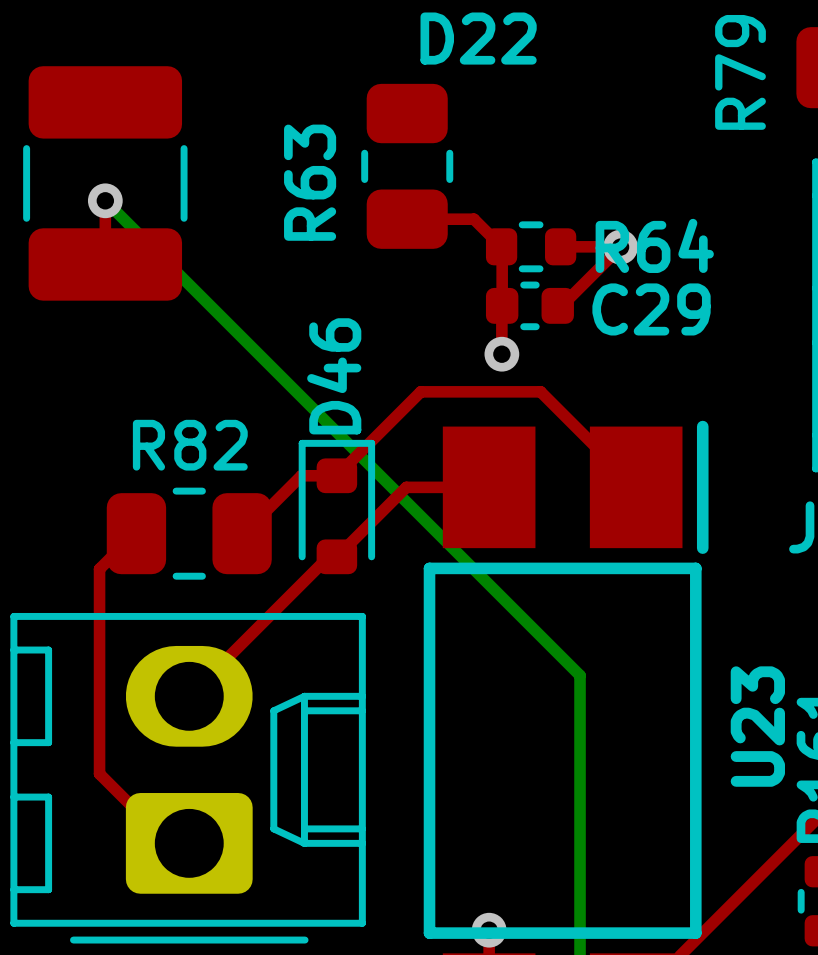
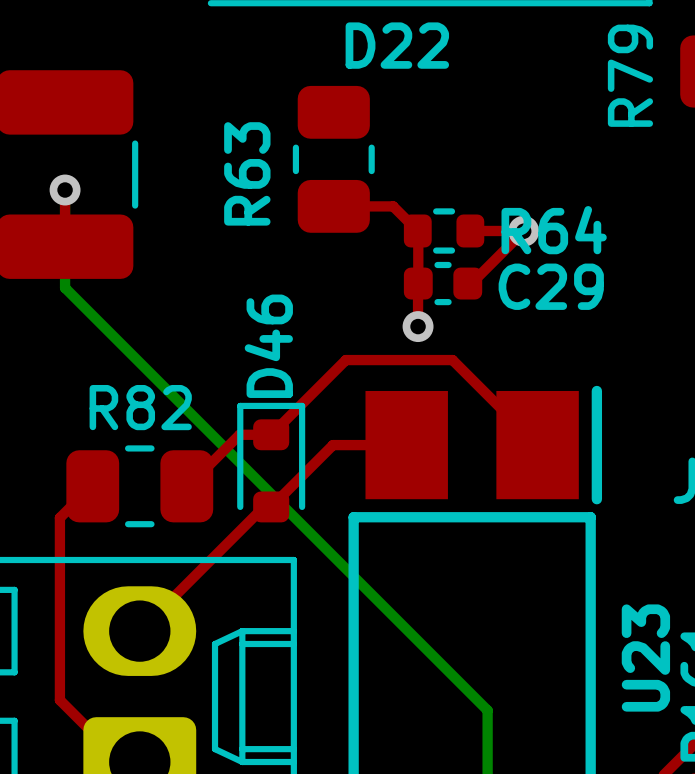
bottom track: (105, 200) (580, 675) (580, 785) -> (65, 190) (65, 287) (487, 710)

